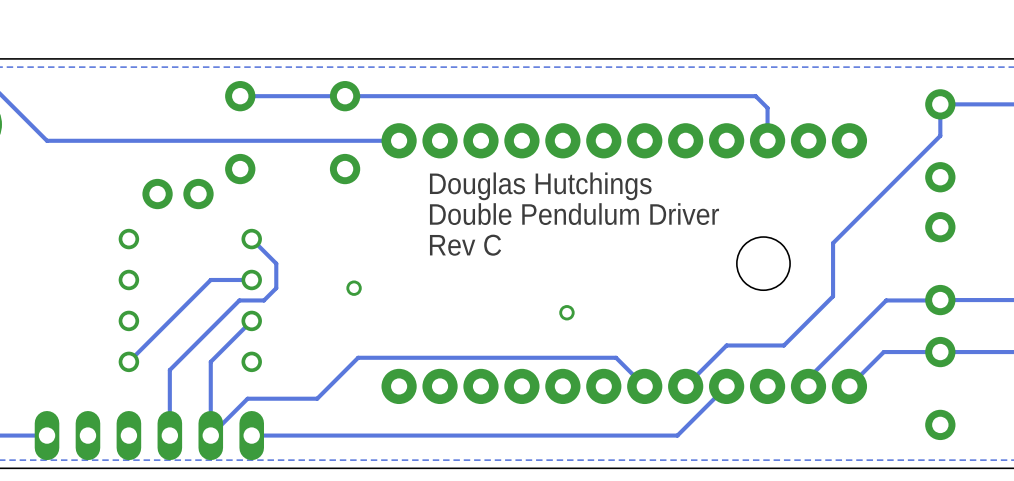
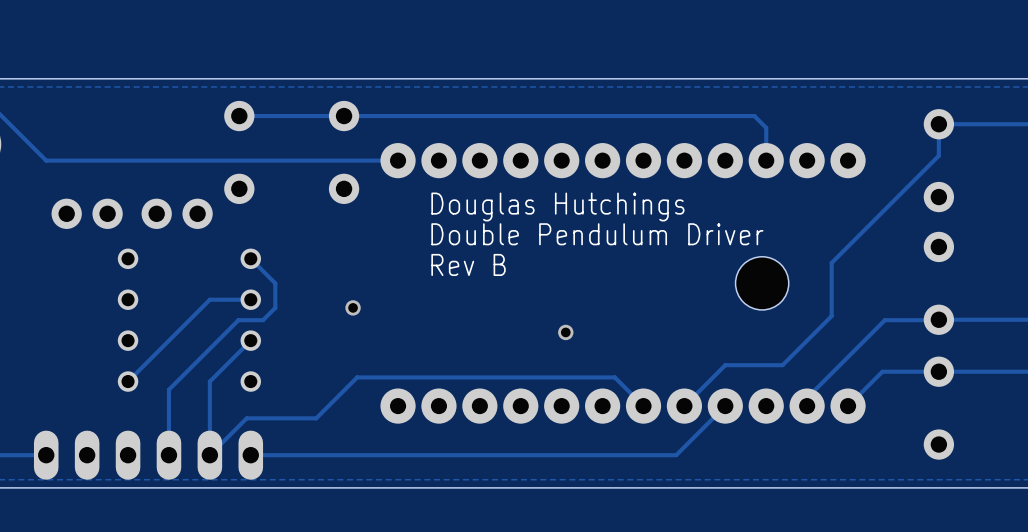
part: none -> (87, 213)
text: Rev C (465, 245) -> Rev B (468, 264)

